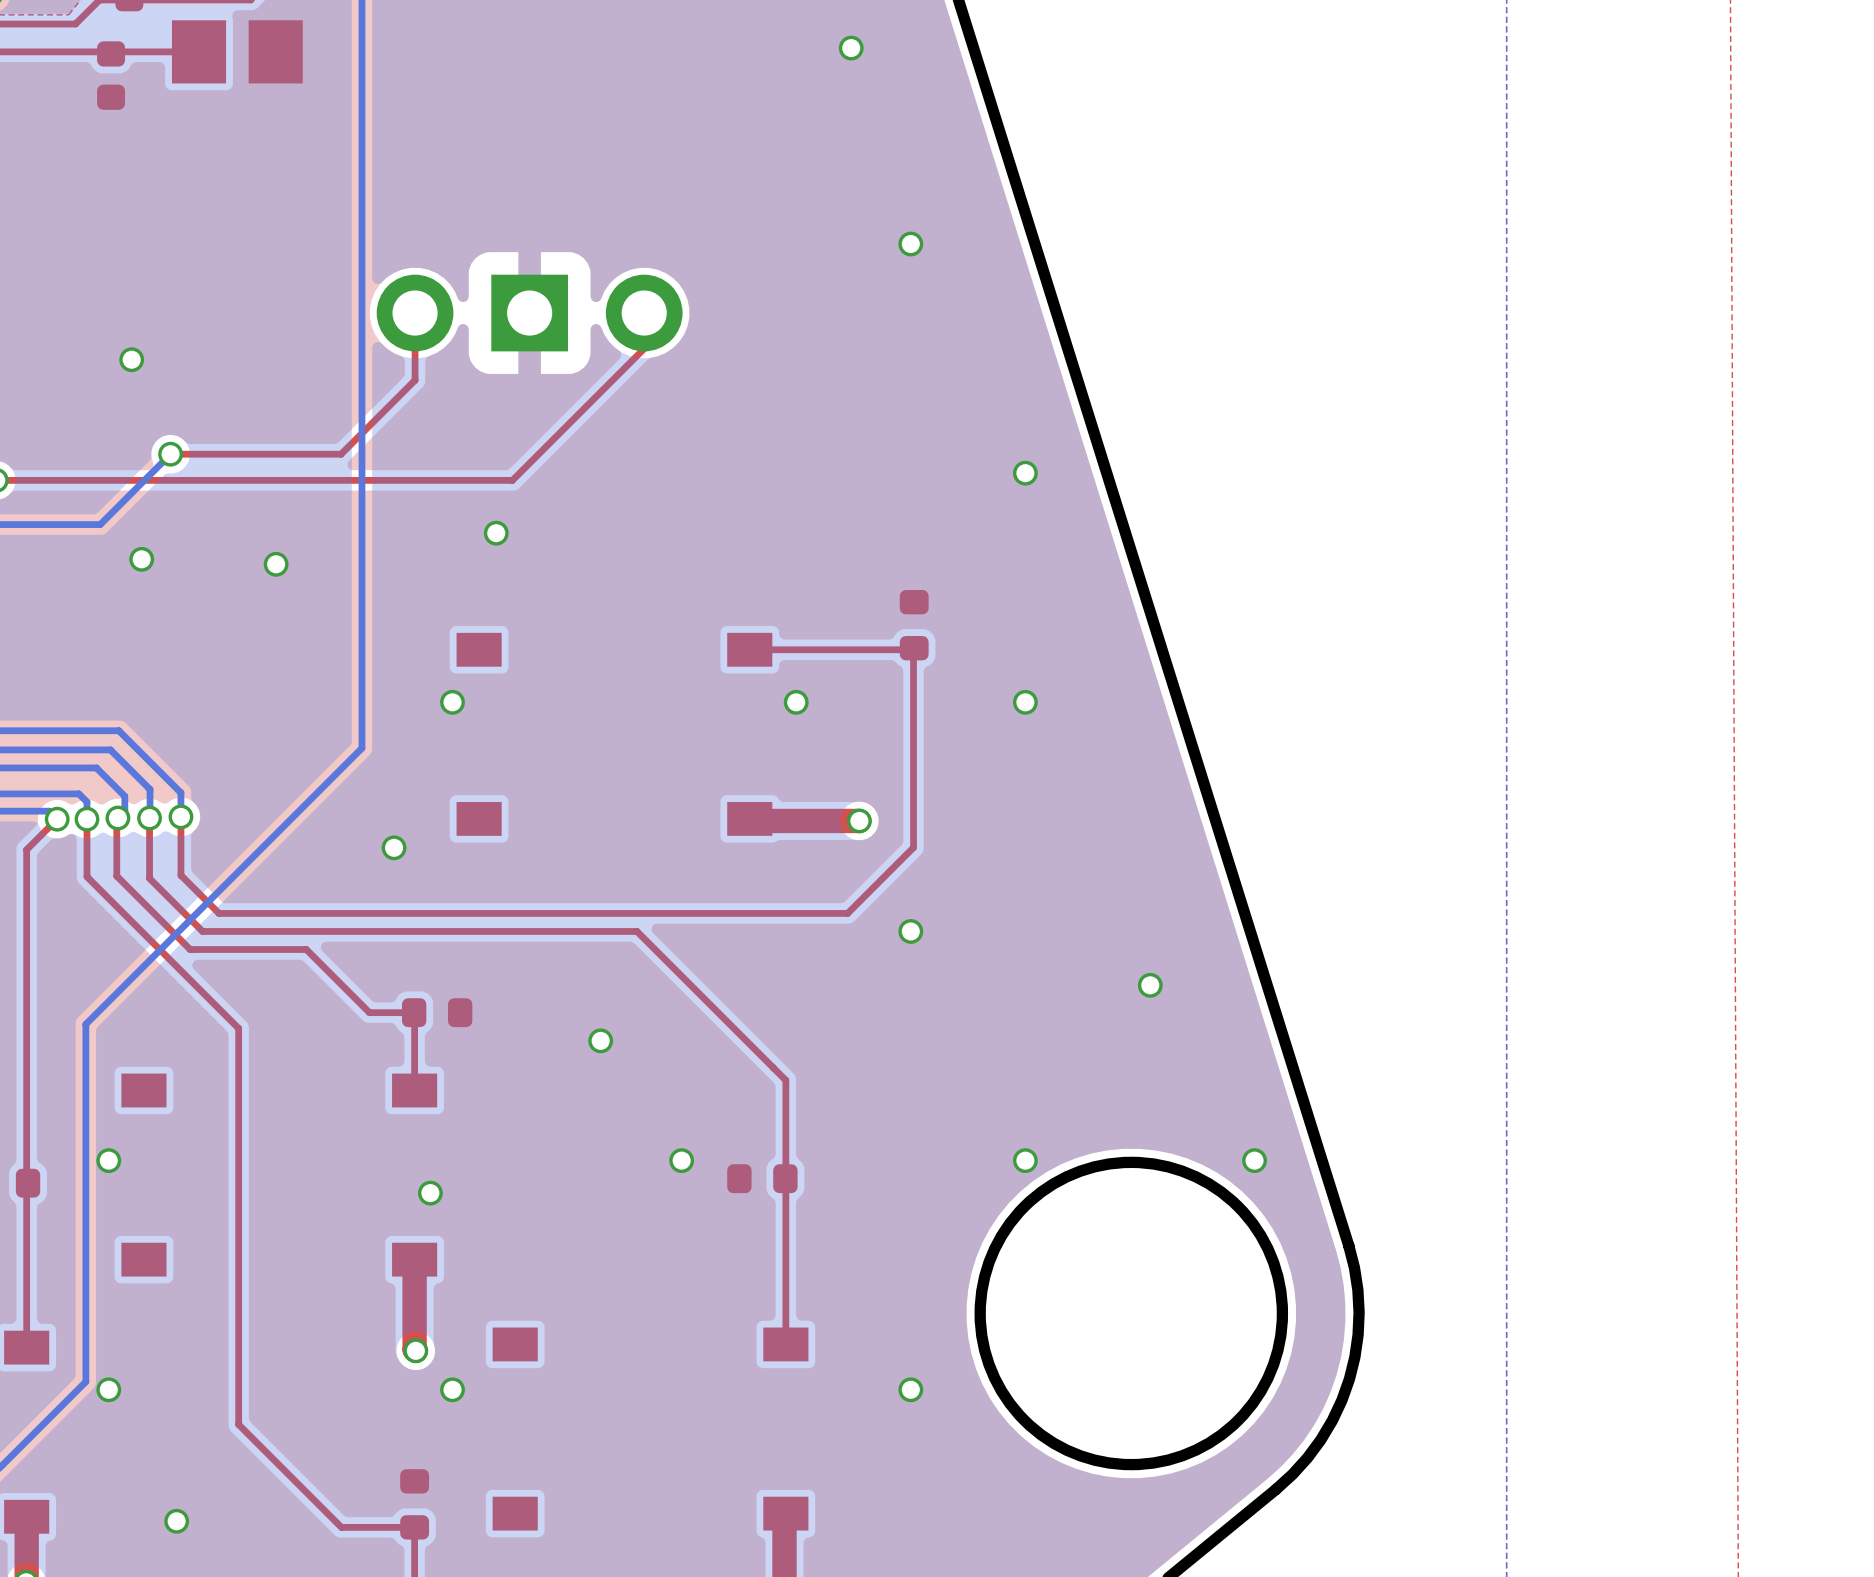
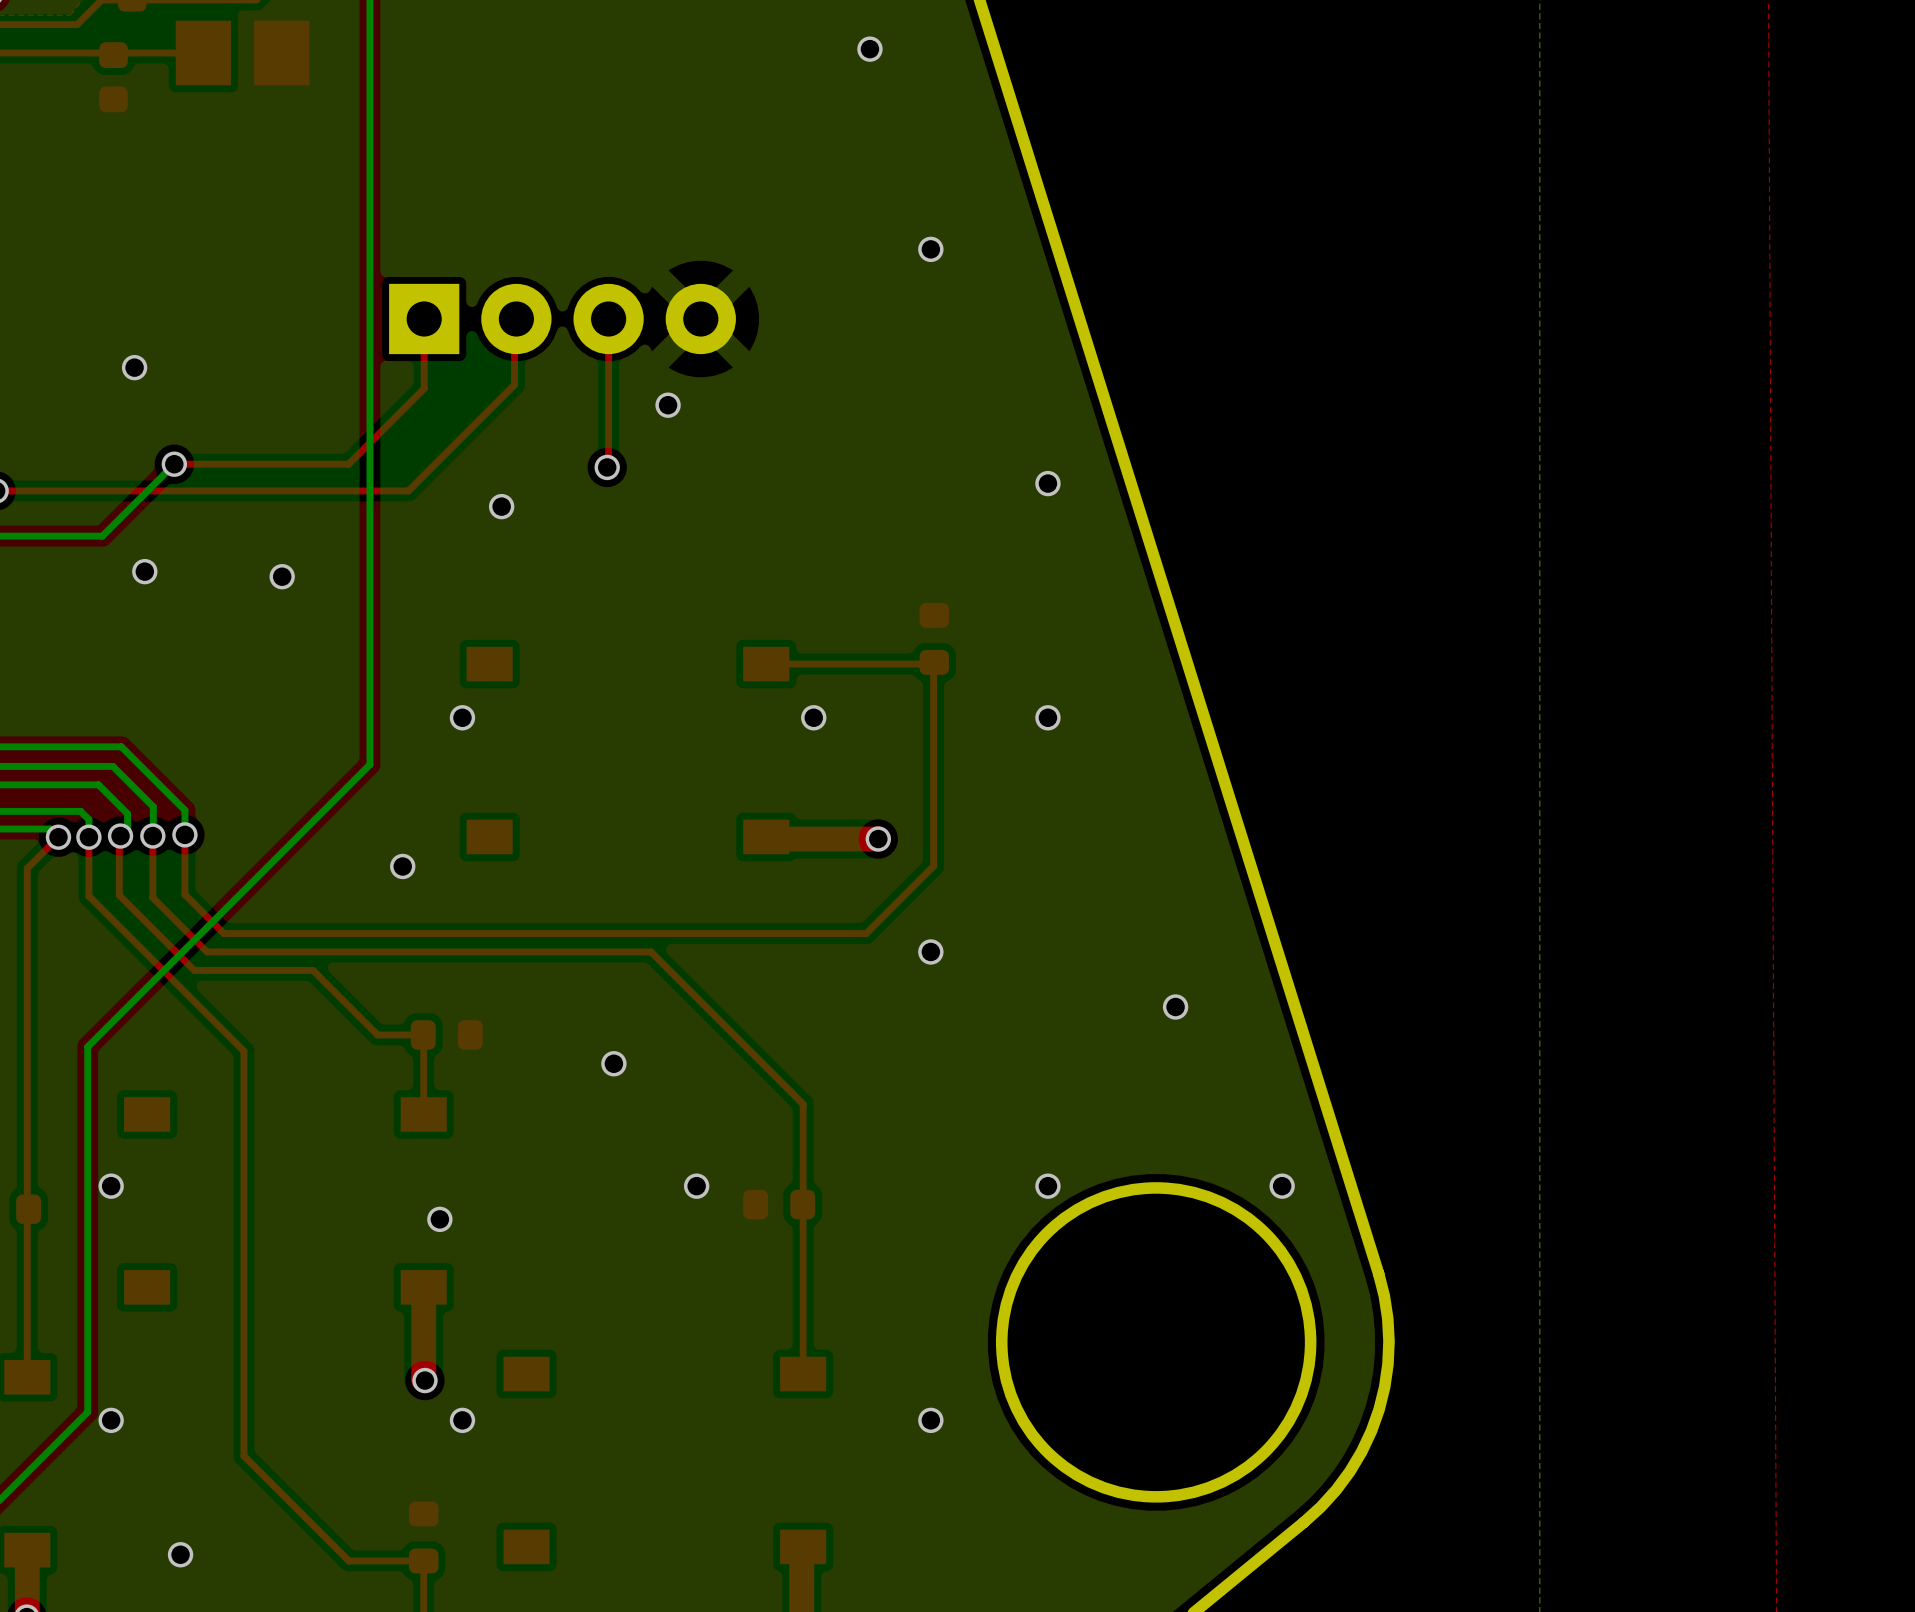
part footprint: [376, 274, 683, 352] -> [389, 283, 736, 355]
top track: none -> (608, 318) (608, 466)
top track: (644, 313) (644, 348) (512, 480) (399, 480) -> (516, 318) (514, 384) (408, 490)
via: none -> (668, 405)
via: none -> (607, 467)
via position: (496, 533) -> (501, 506)

